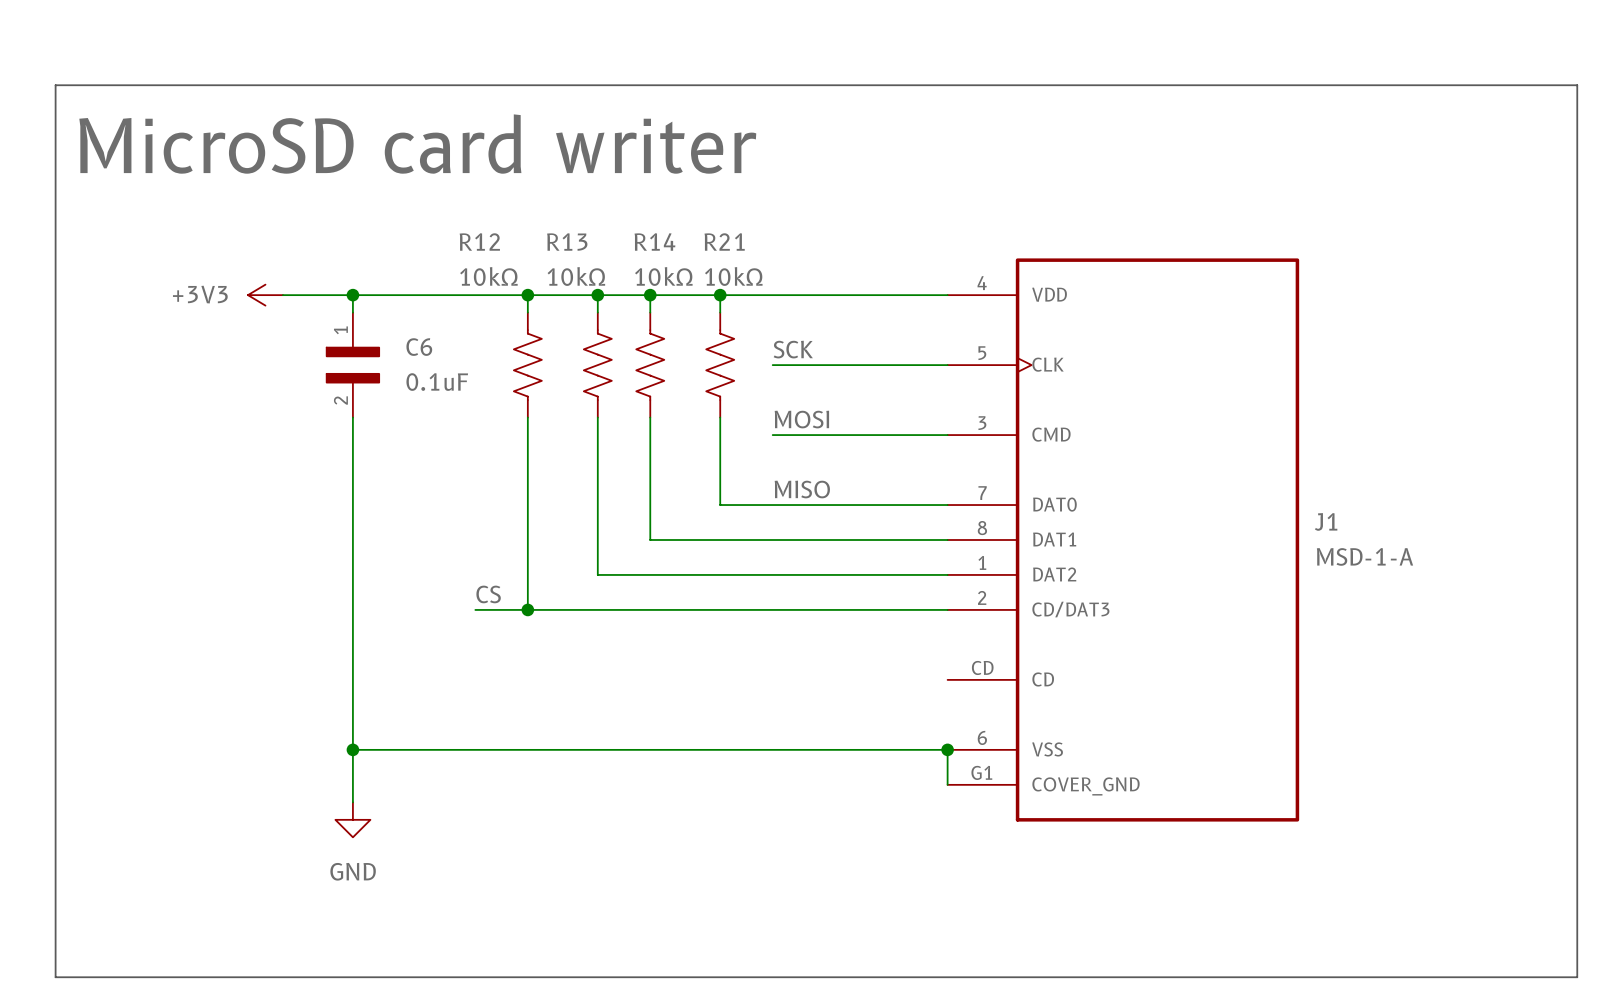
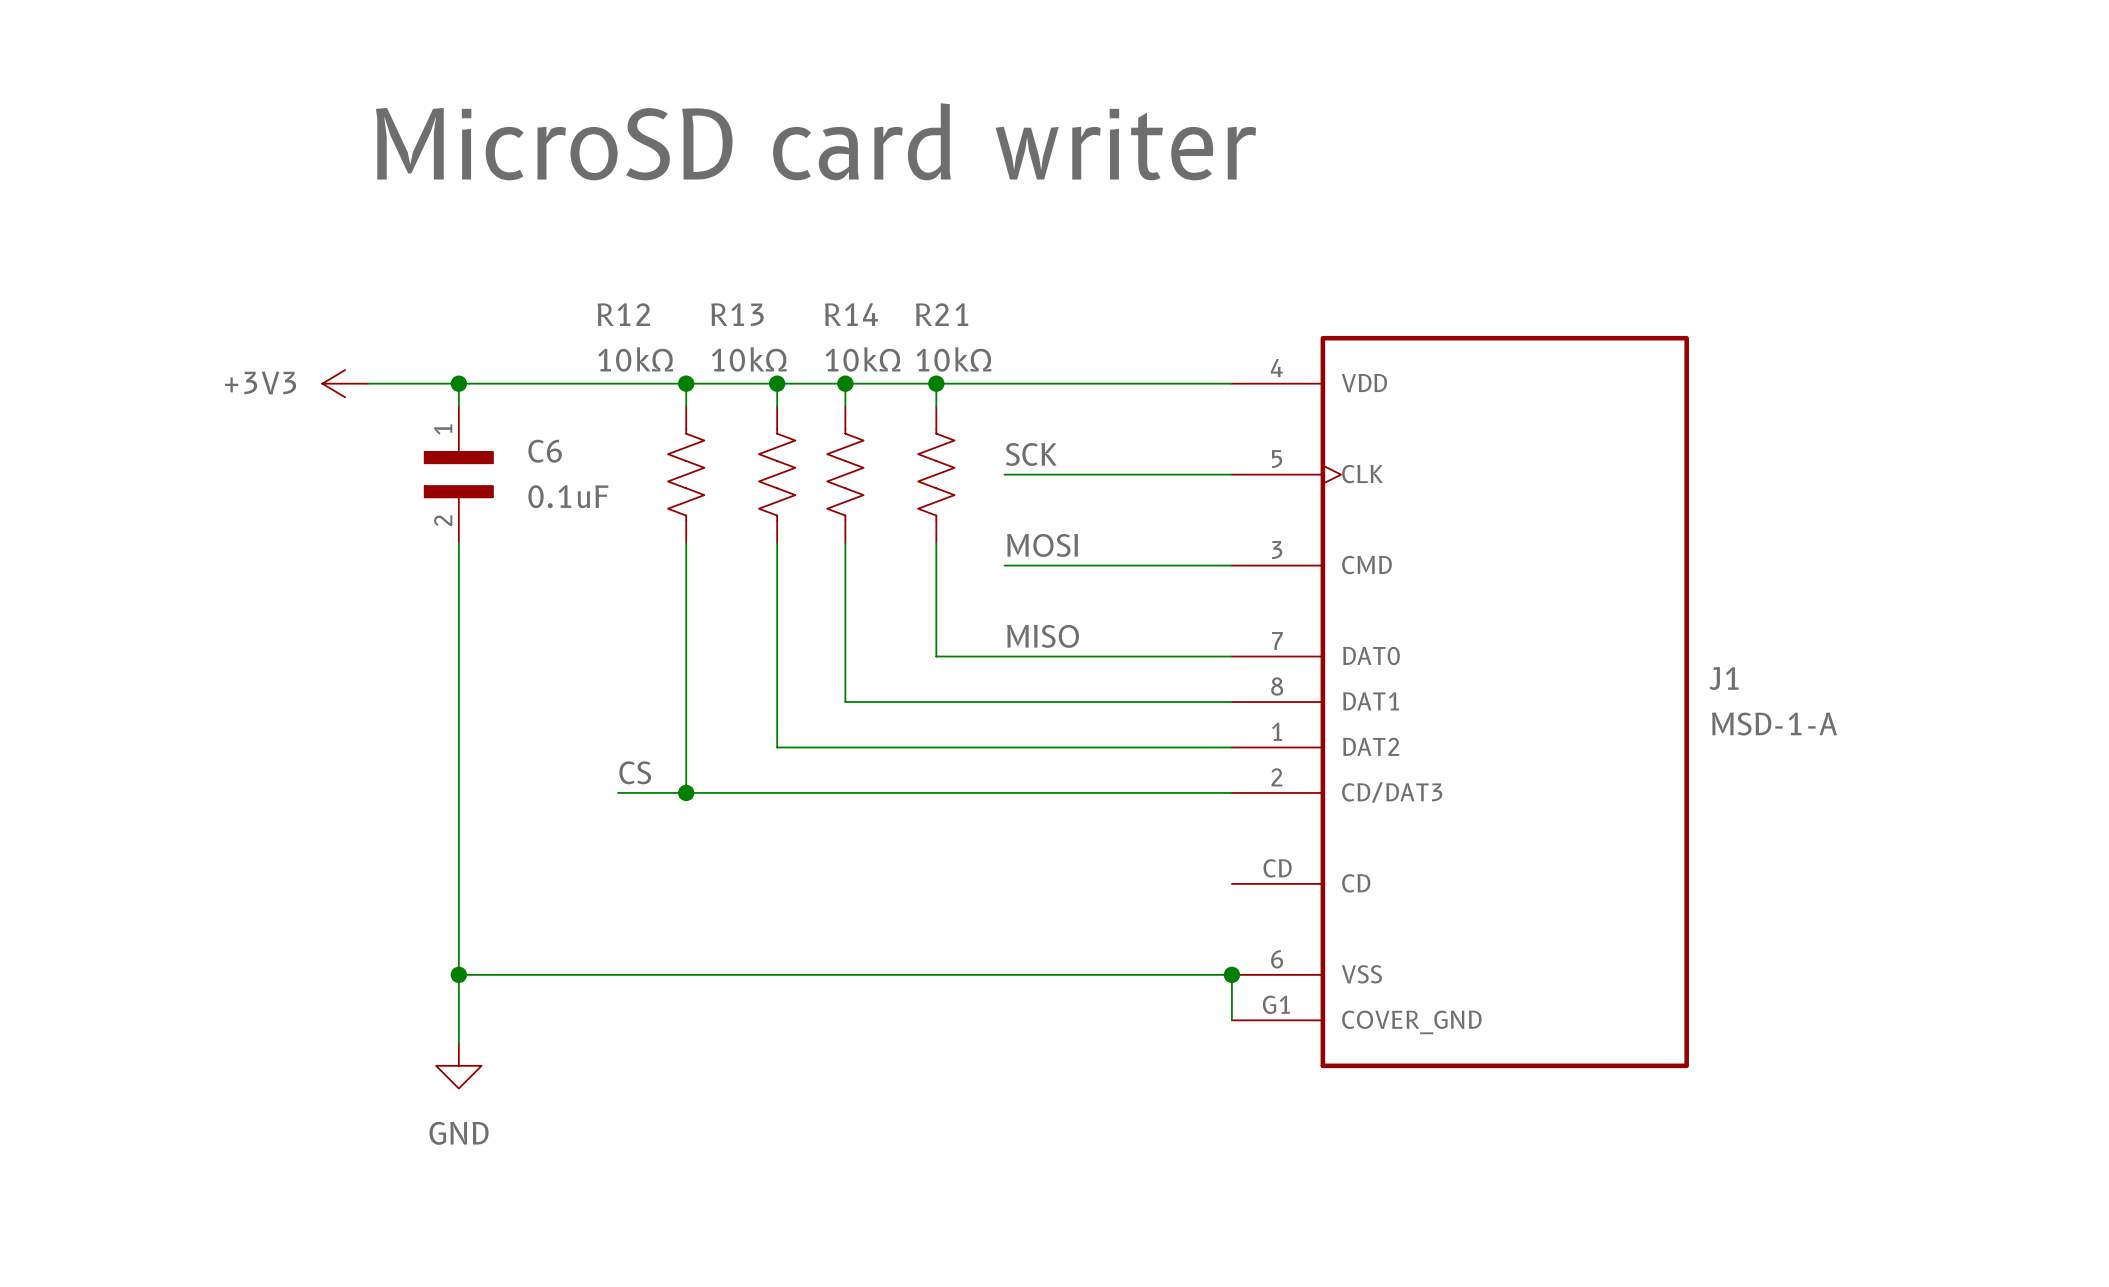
line: (55, 85) (1577, 85) (1577, 977) (55, 977) (55, 85) -> none
label position: MicroSD card writer (417, 144) -> MicroSD card writer (815, 141)

